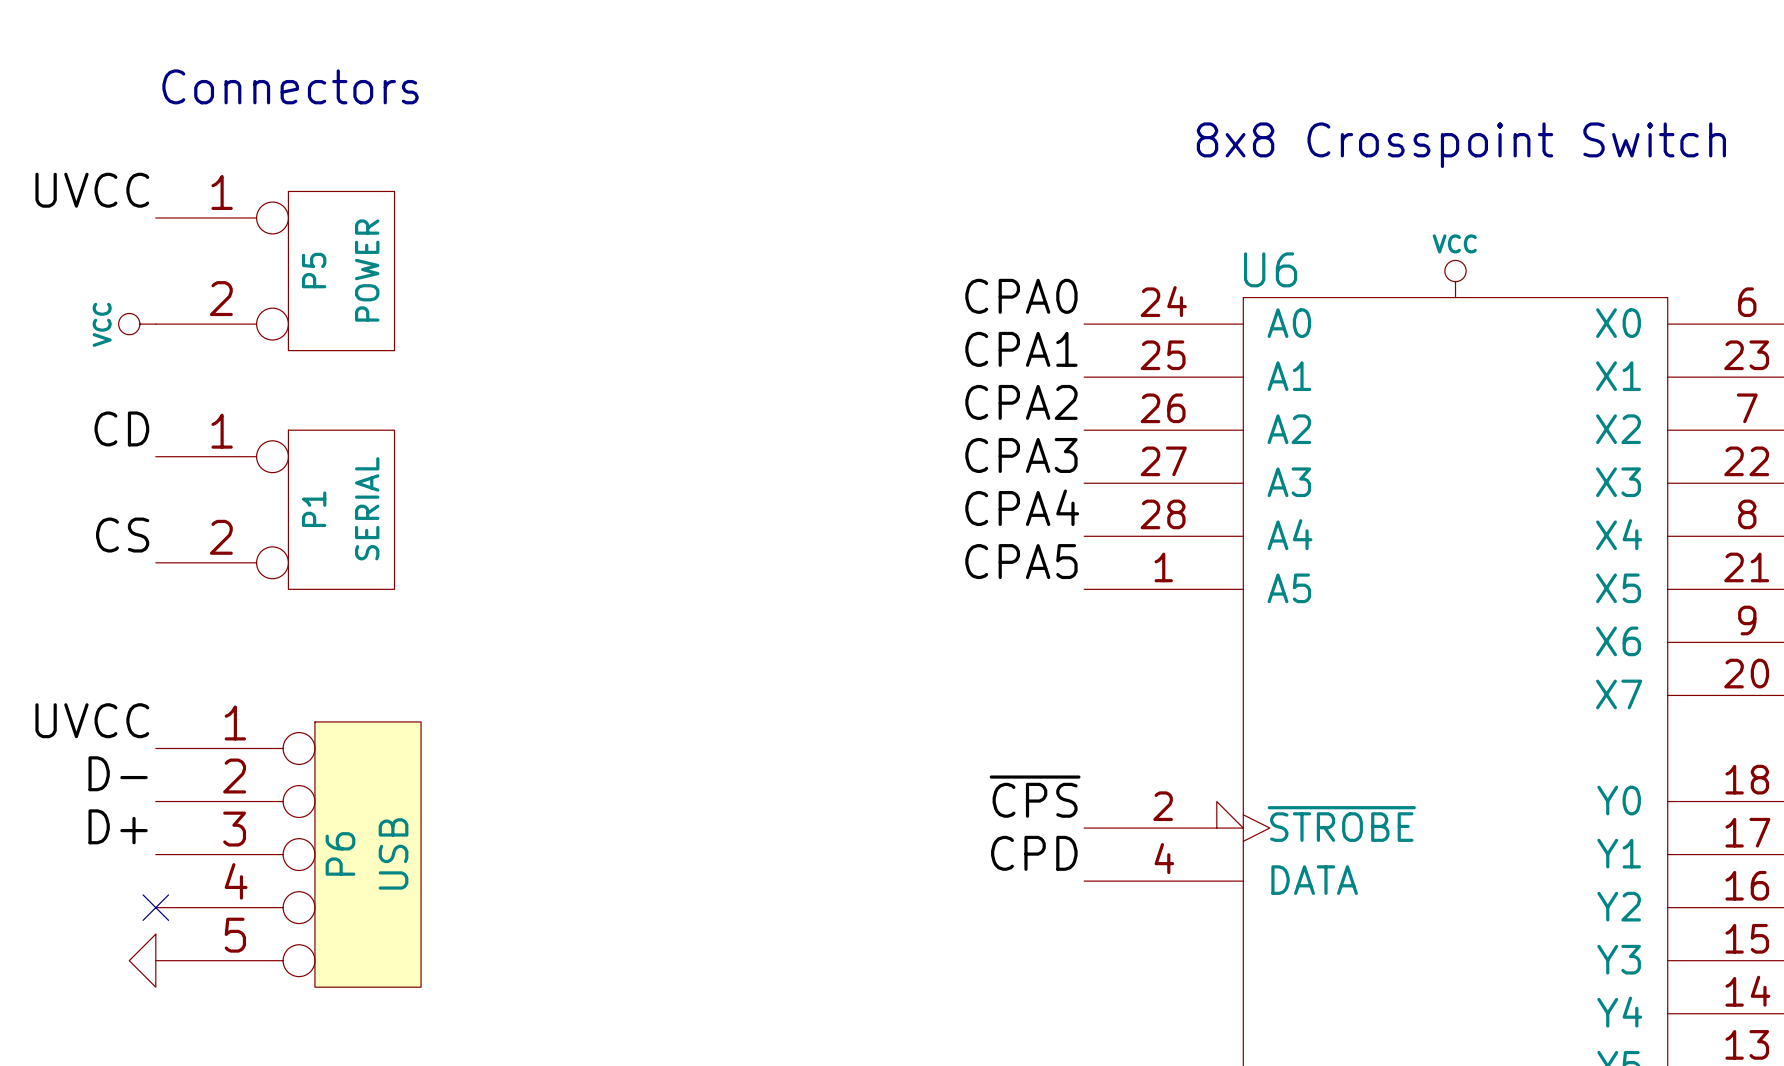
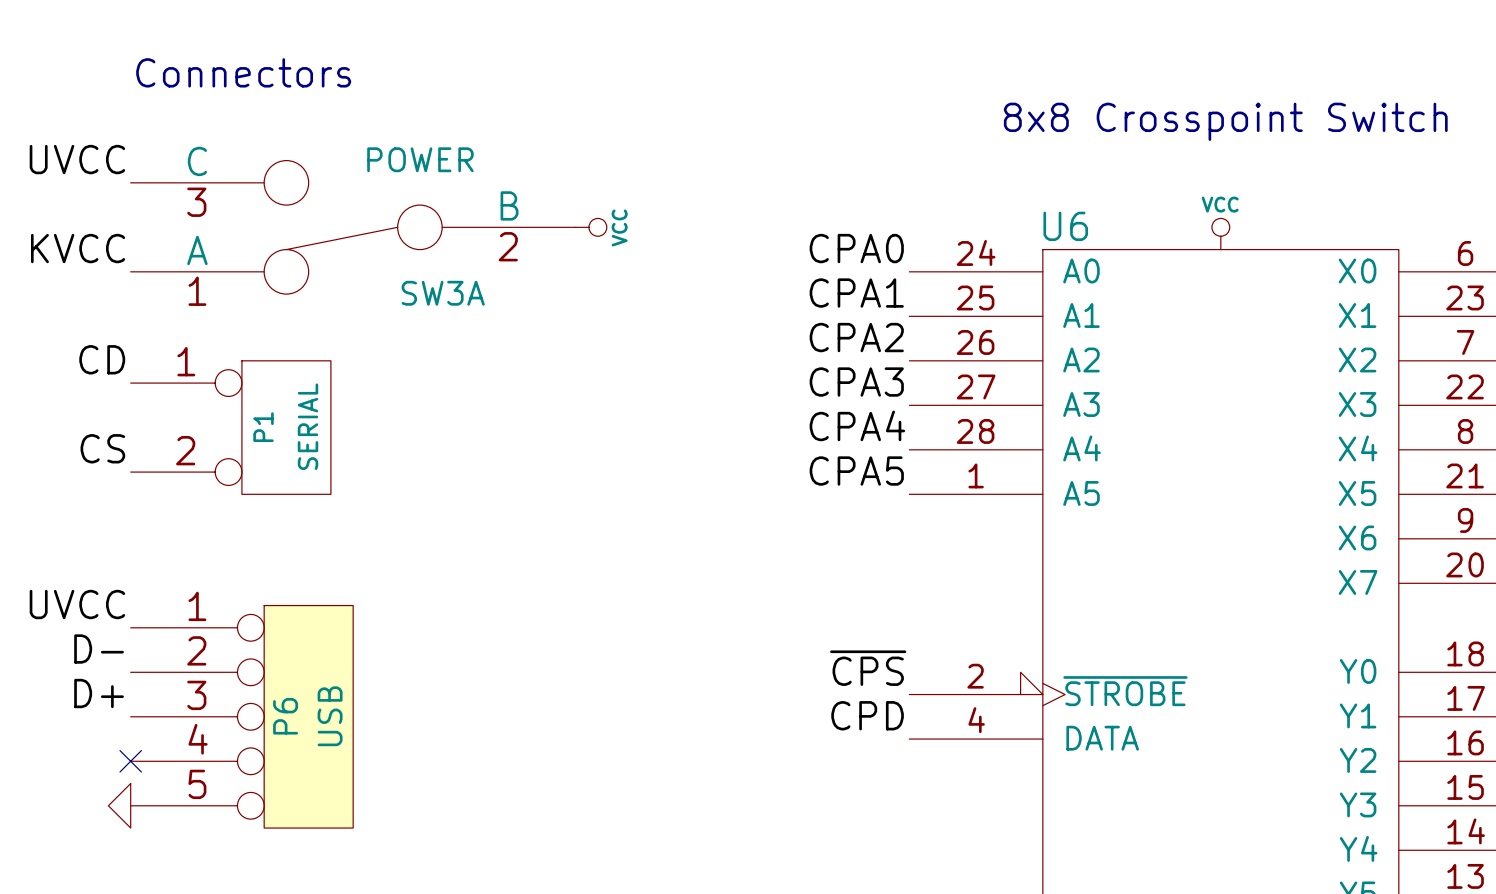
P5: POWER (275, 271) -> none
SW3A: none -> POWER (353, 227)
power symbol: none -> VCC (591, 227)
label: none -> KVCC (78, 248)
power symbol: VCC (137, 324) -> none

